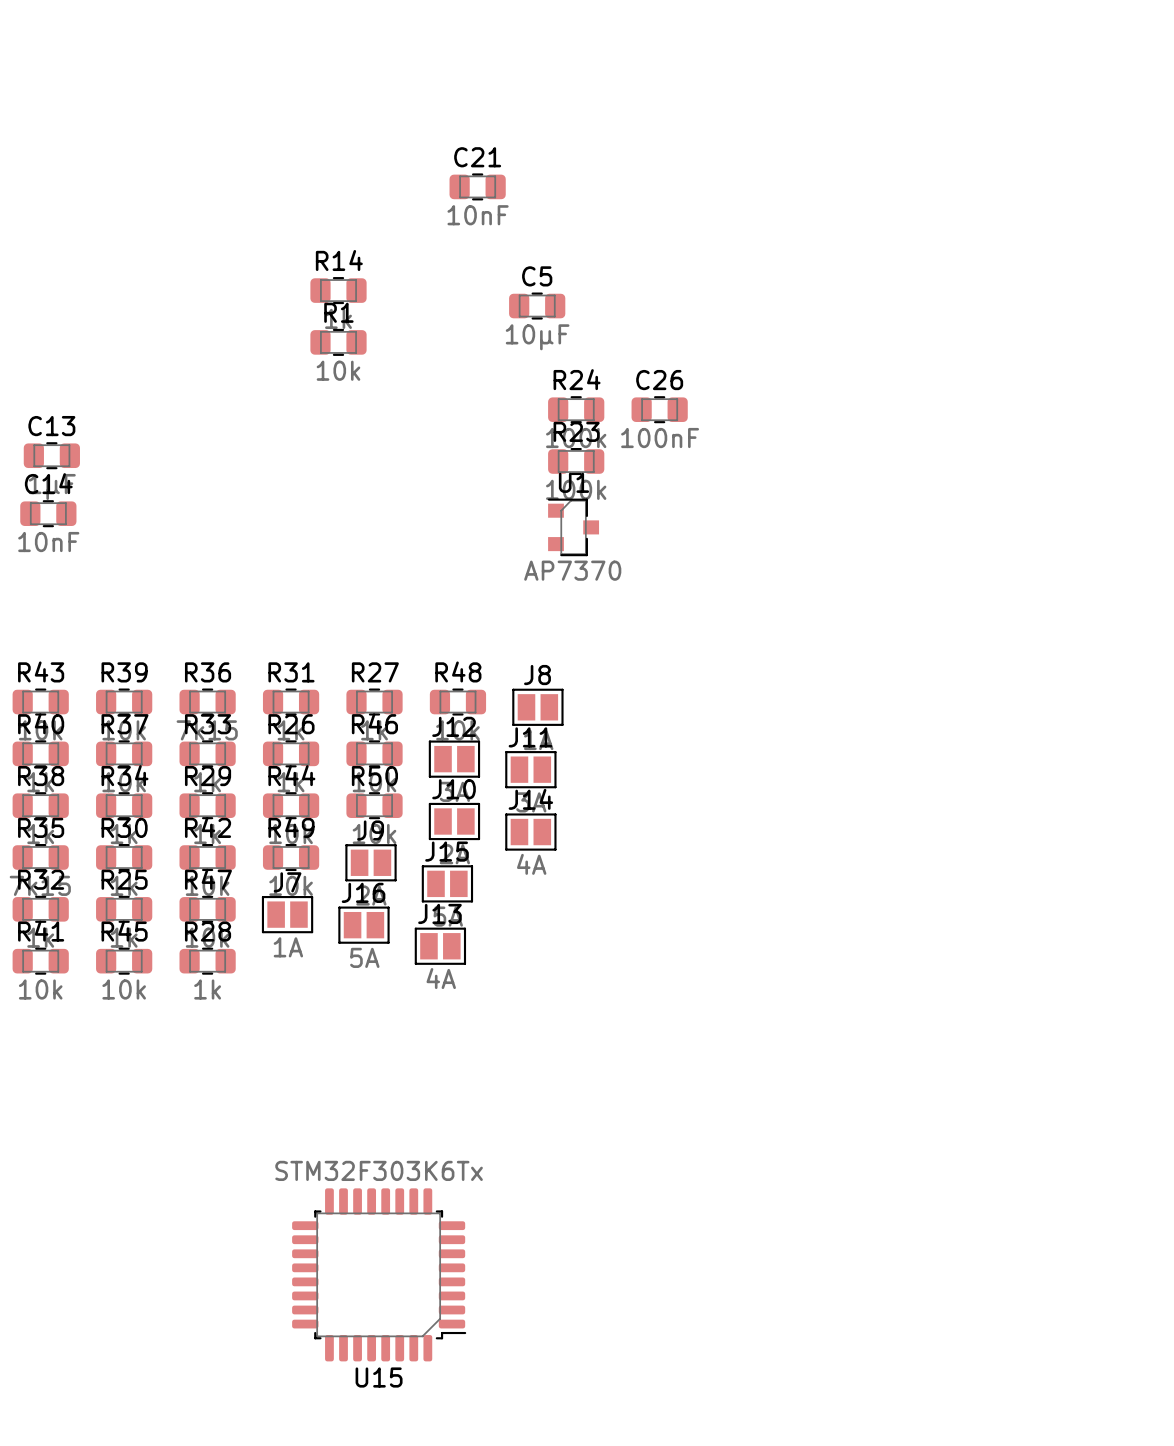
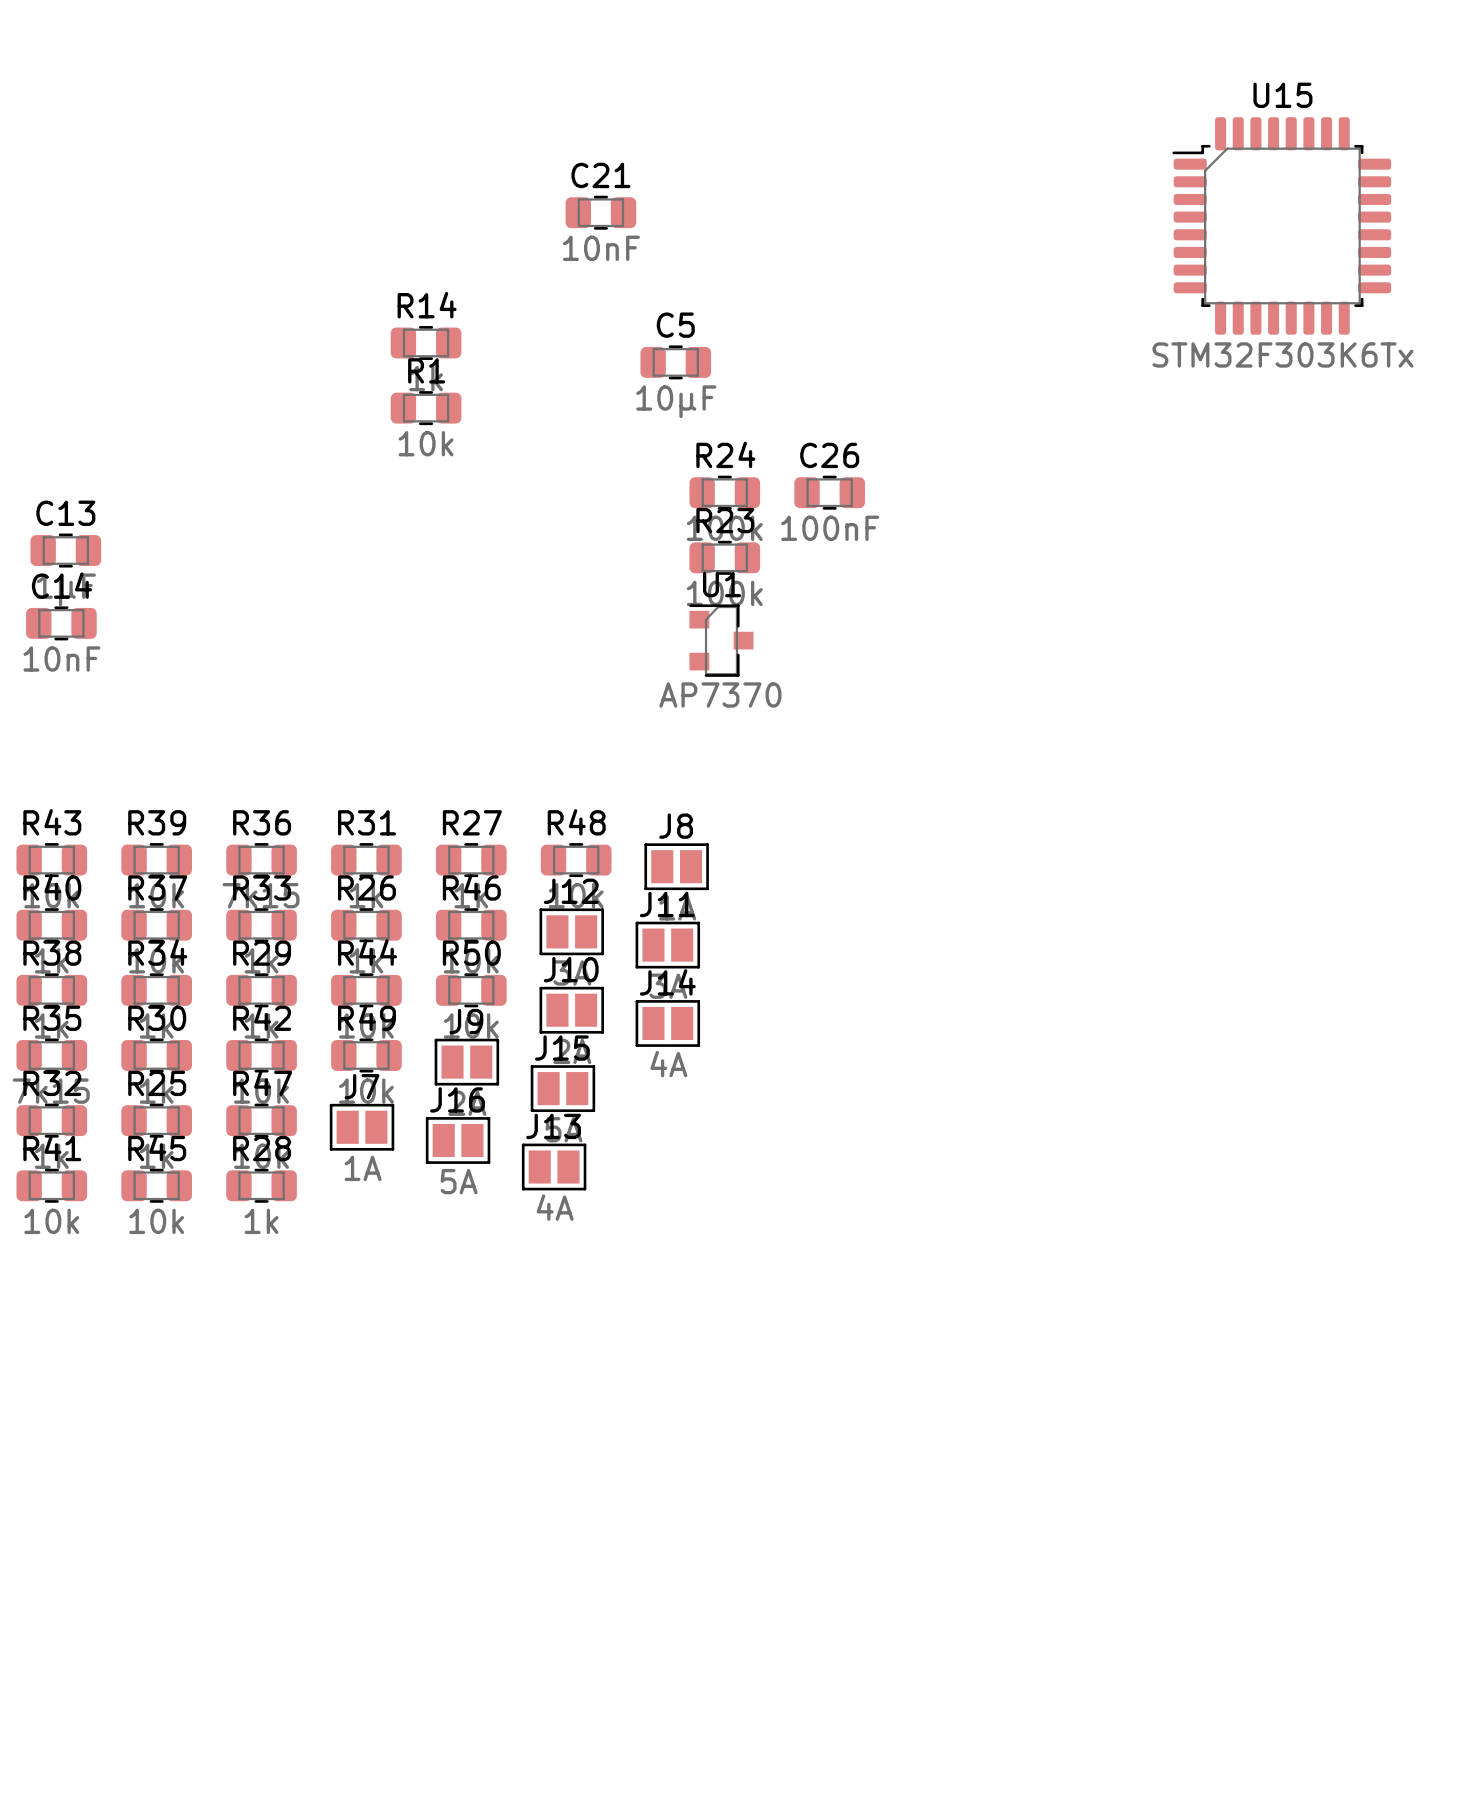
U15 rotation: 0° (379, 1274) -> 180° (1281, 225)
U15 position: (379, 1274) -> (1281, 225)

